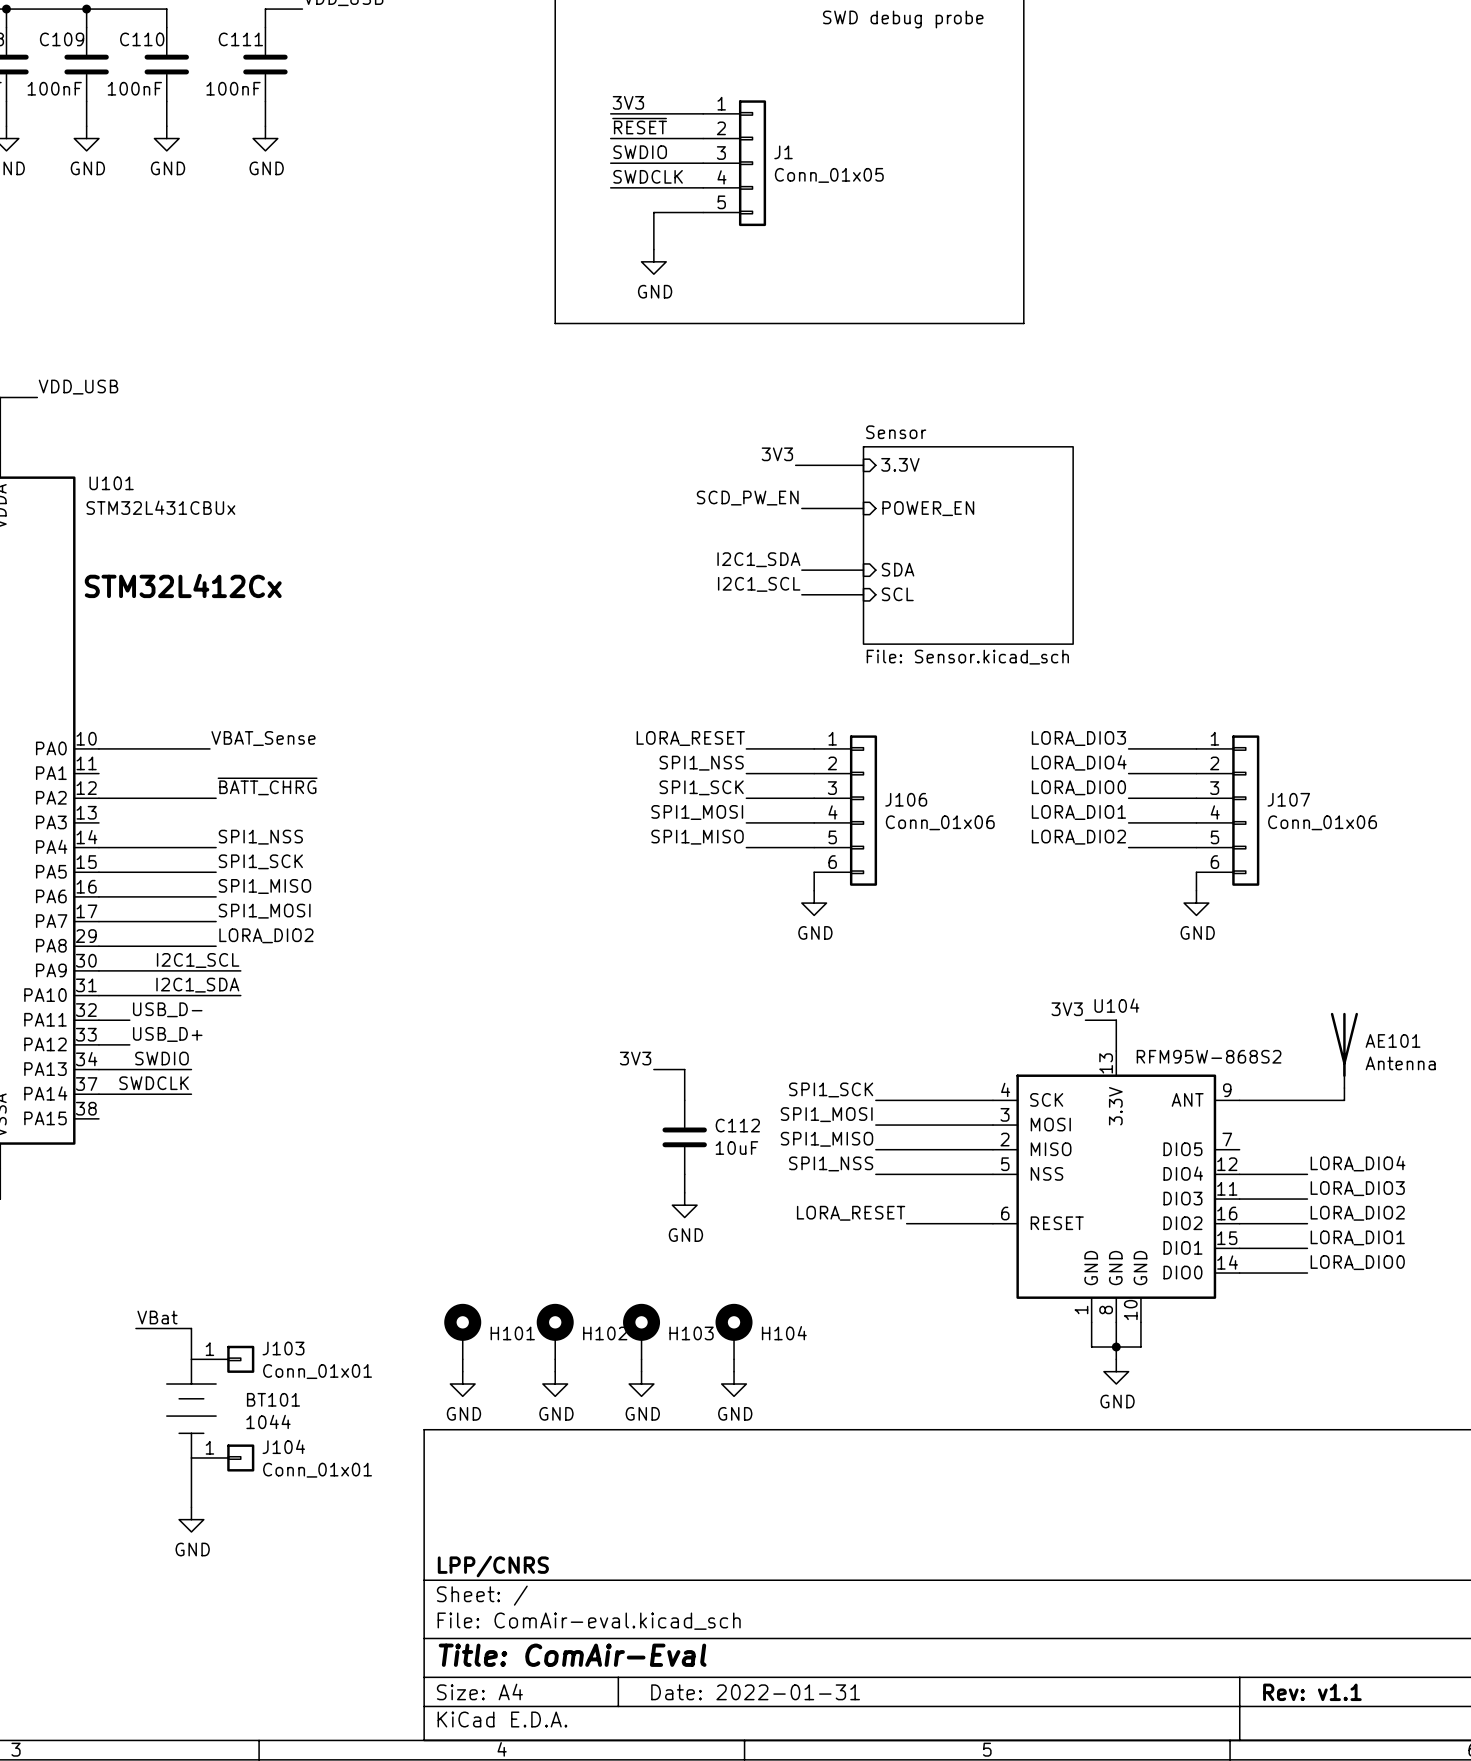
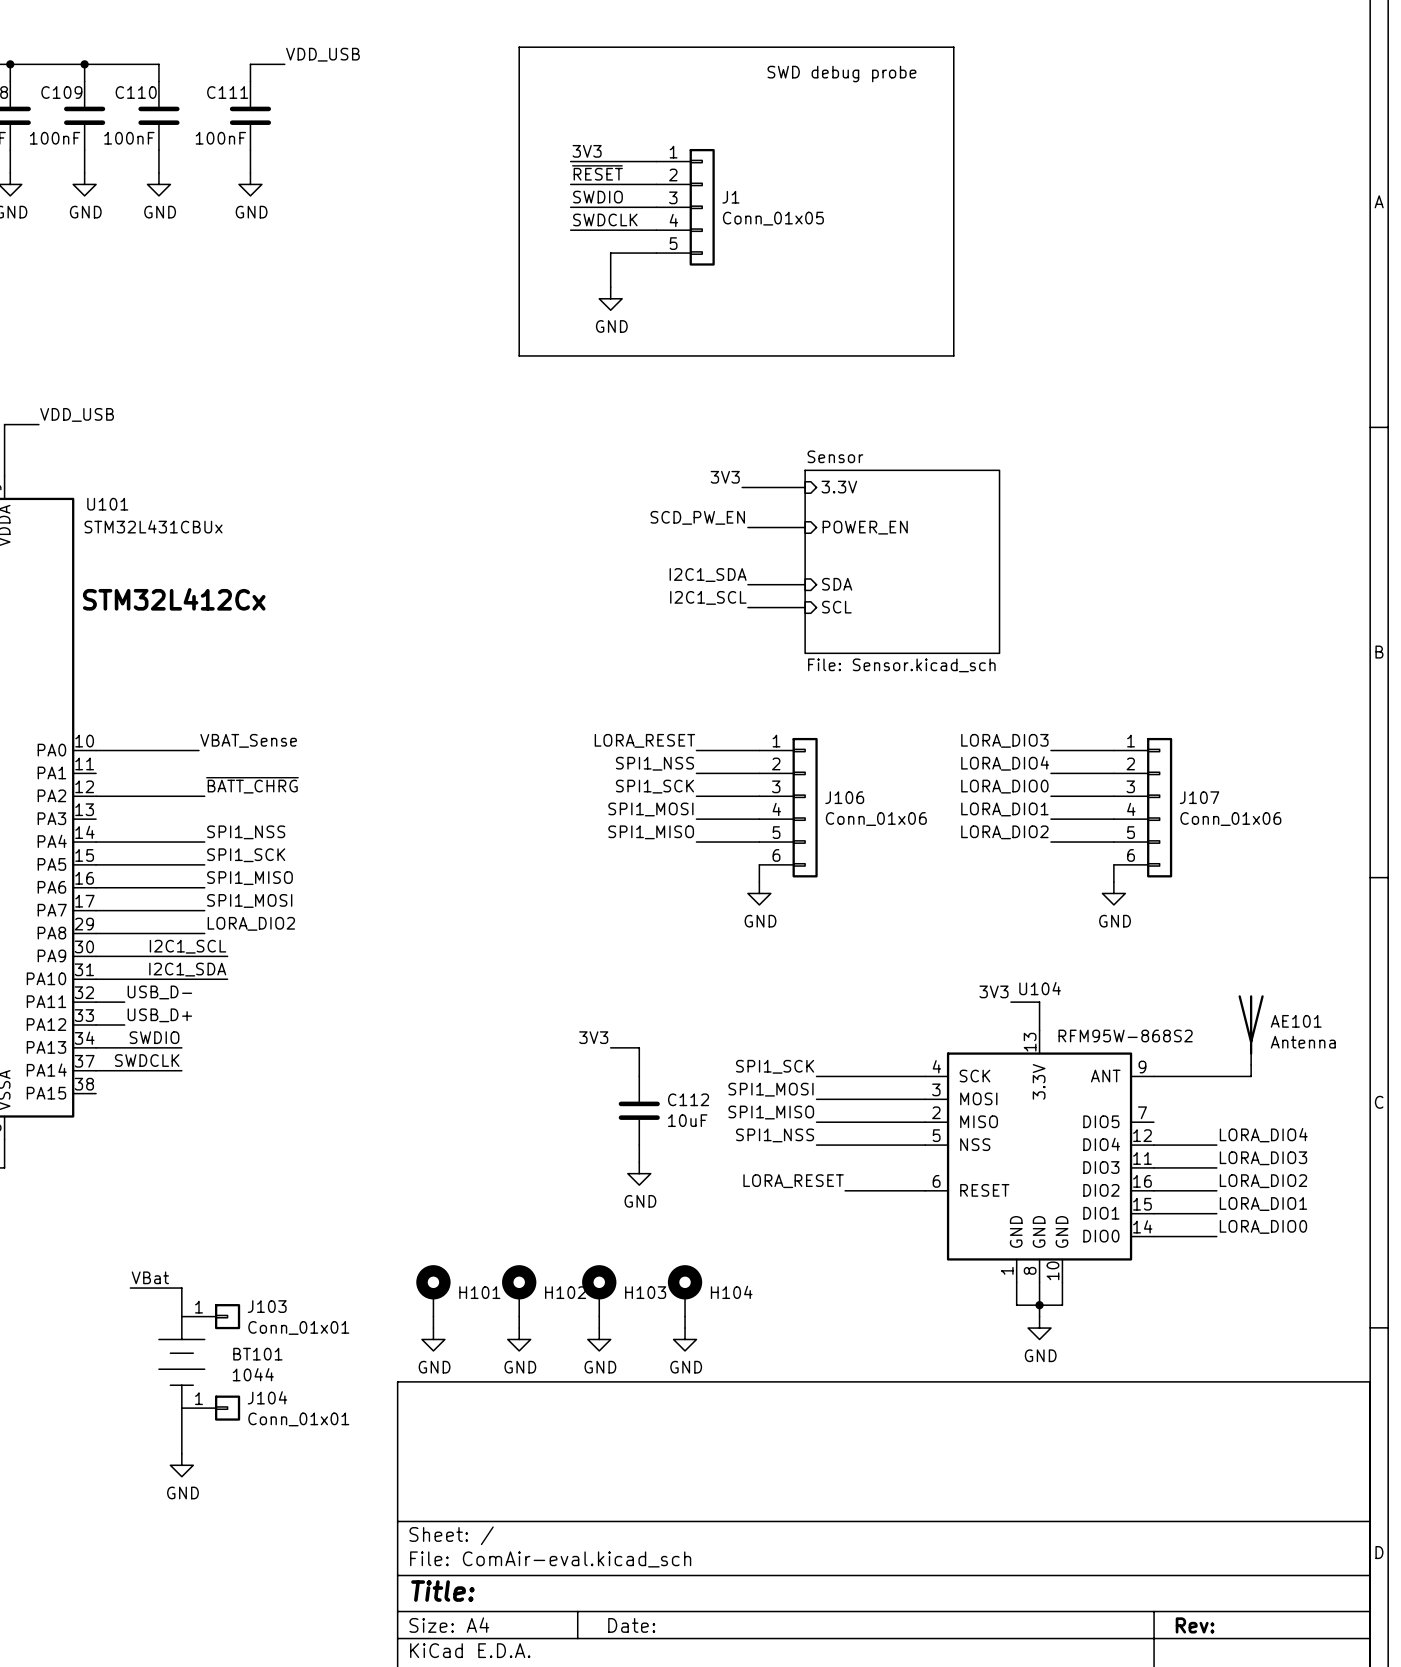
title block: LPP/CNRS (493, 1566) -> none
title block: Title: ComAir-Eval (572, 1655) -> Title: (442, 1591)
title block: Date: 2022-01-31 (755, 1692) -> Date: (631, 1625)
title block: Rev: v1.1 (1312, 1692) -> Rev: (1195, 1625)

